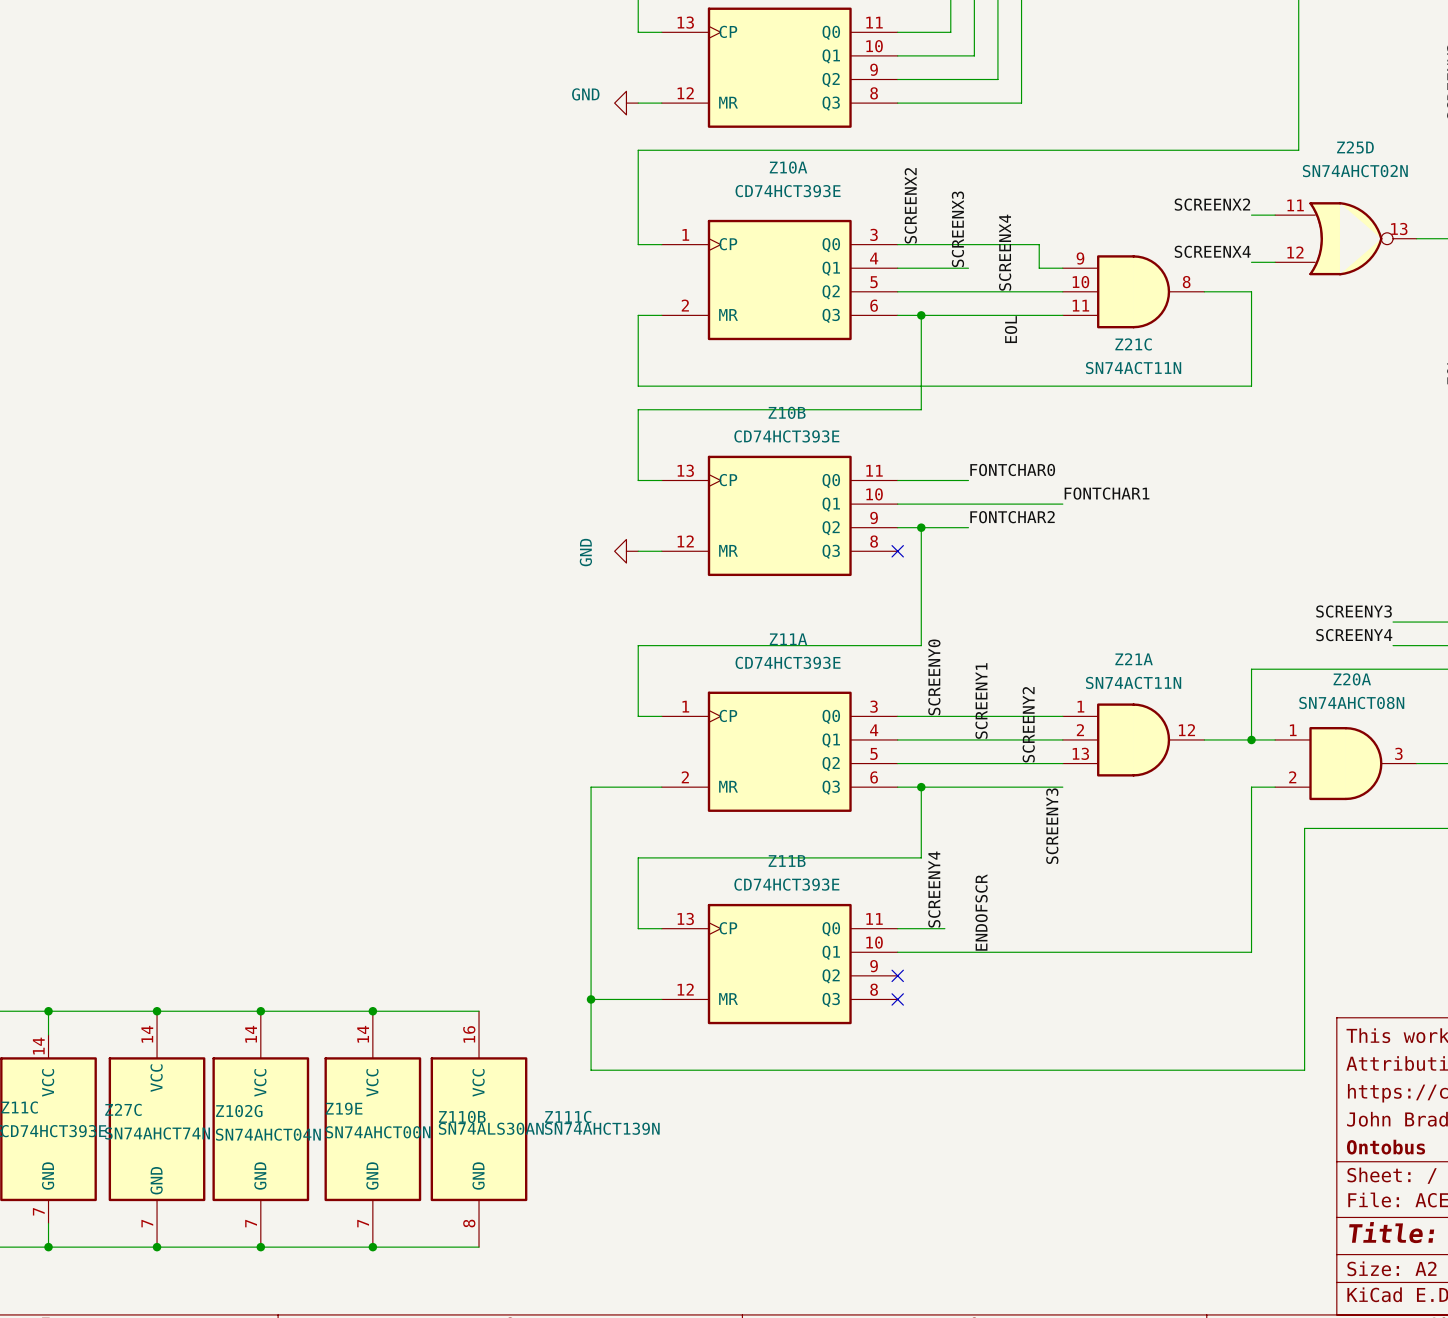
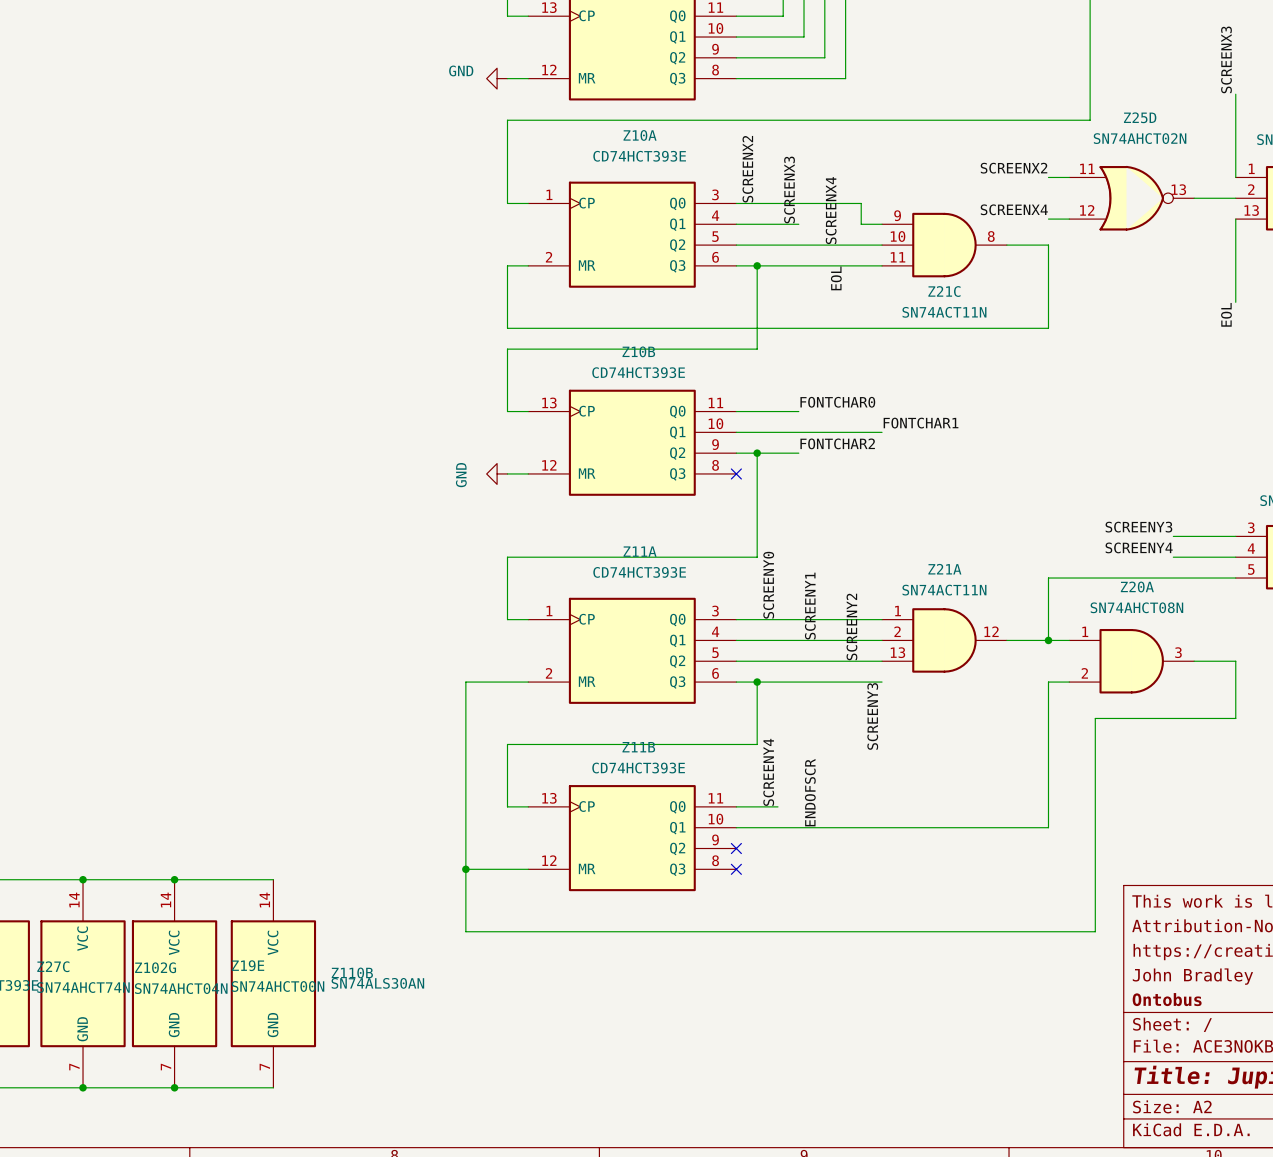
wire: (372, 1011) (479, 1011) -> none
junction: (372, 1011) -> none
Z111C: SN74AHCT139N (479, 1129) -> none
wire: (372, 1247) (479, 1247) -> none
junction: (372, 1247) -> none

